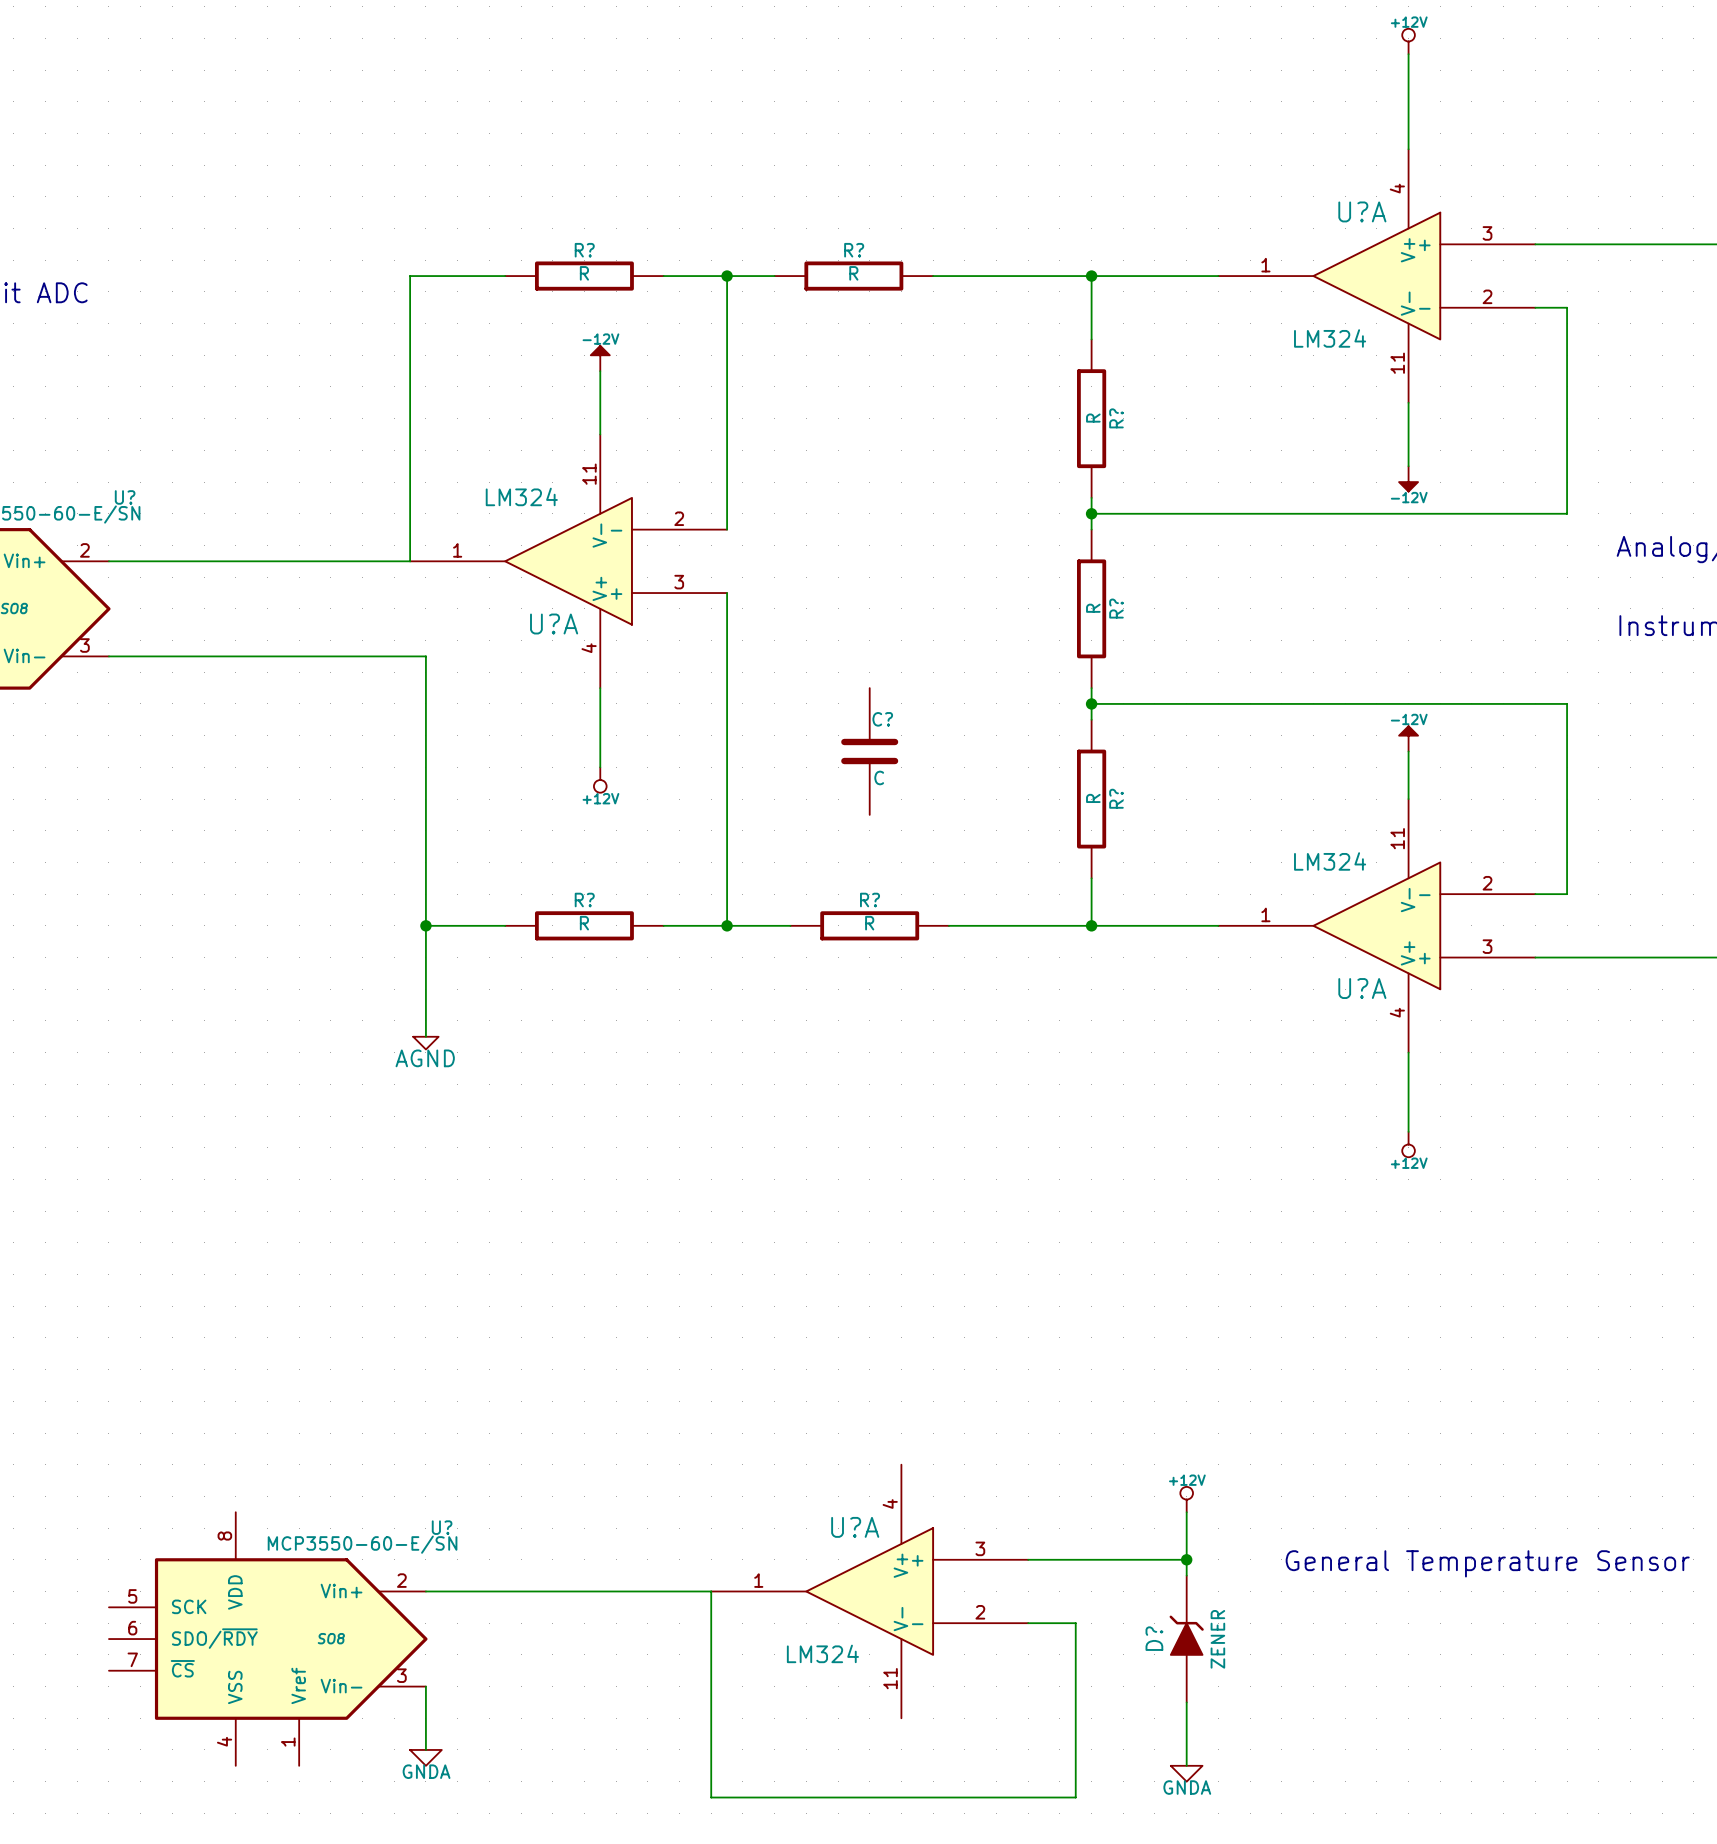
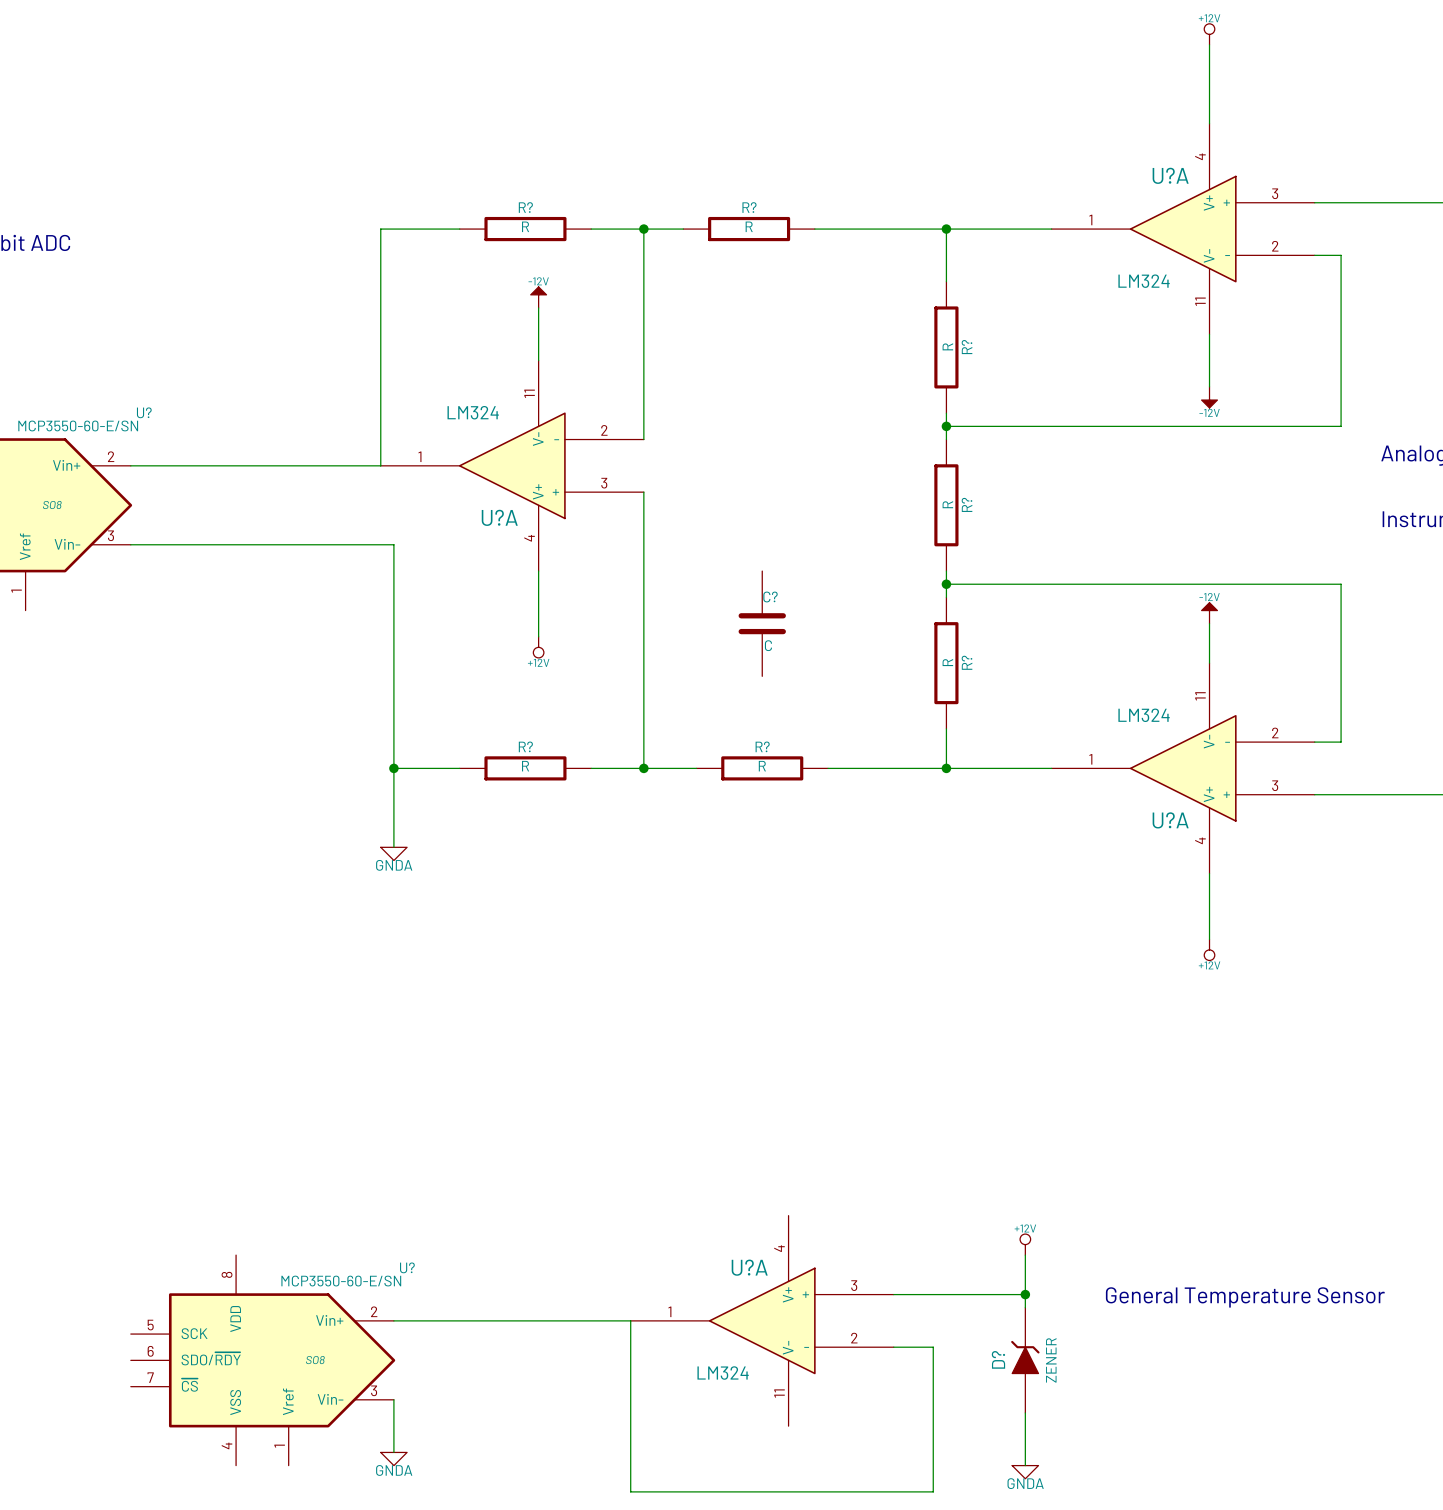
wire: (425, 1020) (425, 1036) -> none
power symbol: none -> GNDA (393, 853)
power symbol: AGND (425, 1043) -> none

